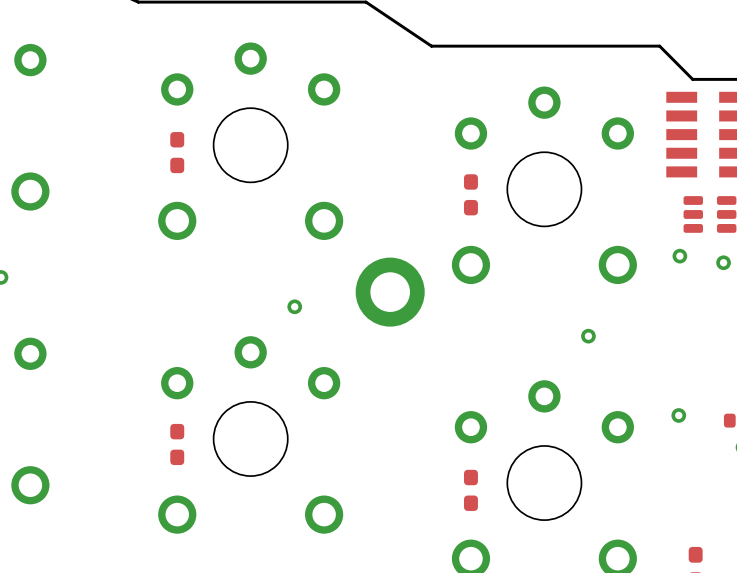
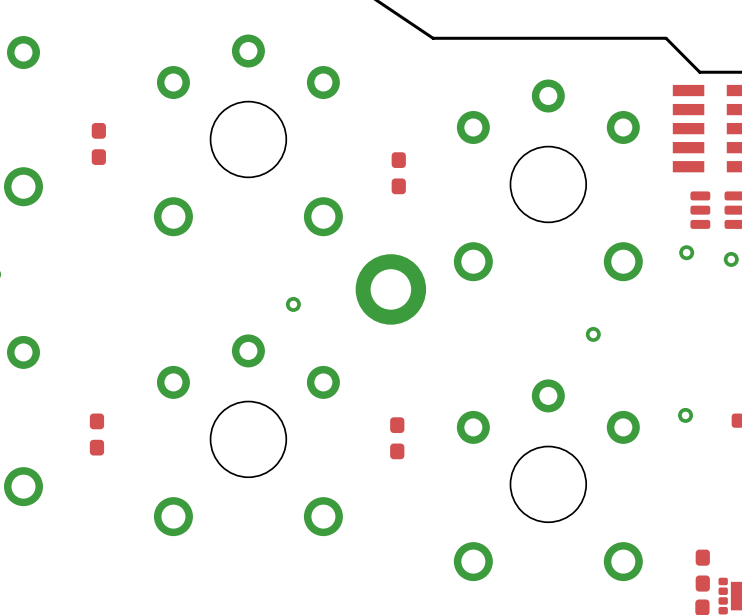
part position: (177, 152) -> (98, 143)
part position: (470, 194) -> (398, 173)
part position: (177, 444) -> (96, 434)
part position: (470, 490) -> (397, 438)

